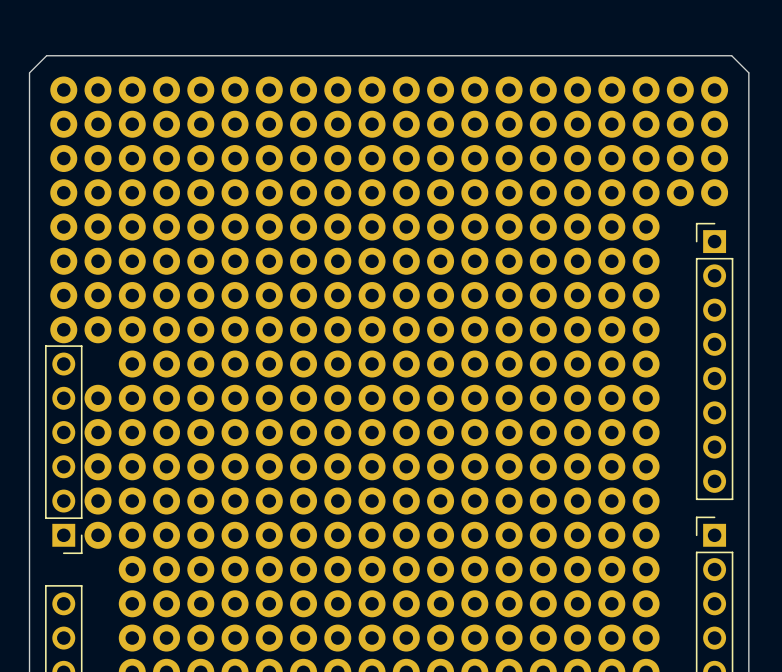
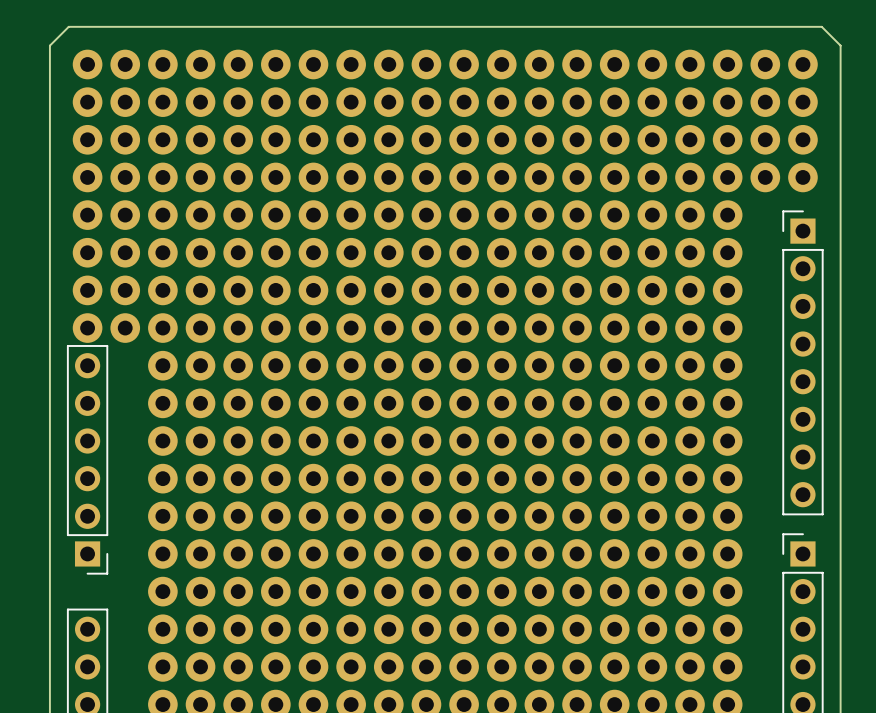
part: (98, 398) -> none
part: (98, 432) -> none
part: (98, 466) -> none
part: (98, 501) -> none
part: (98, 535) -> none

